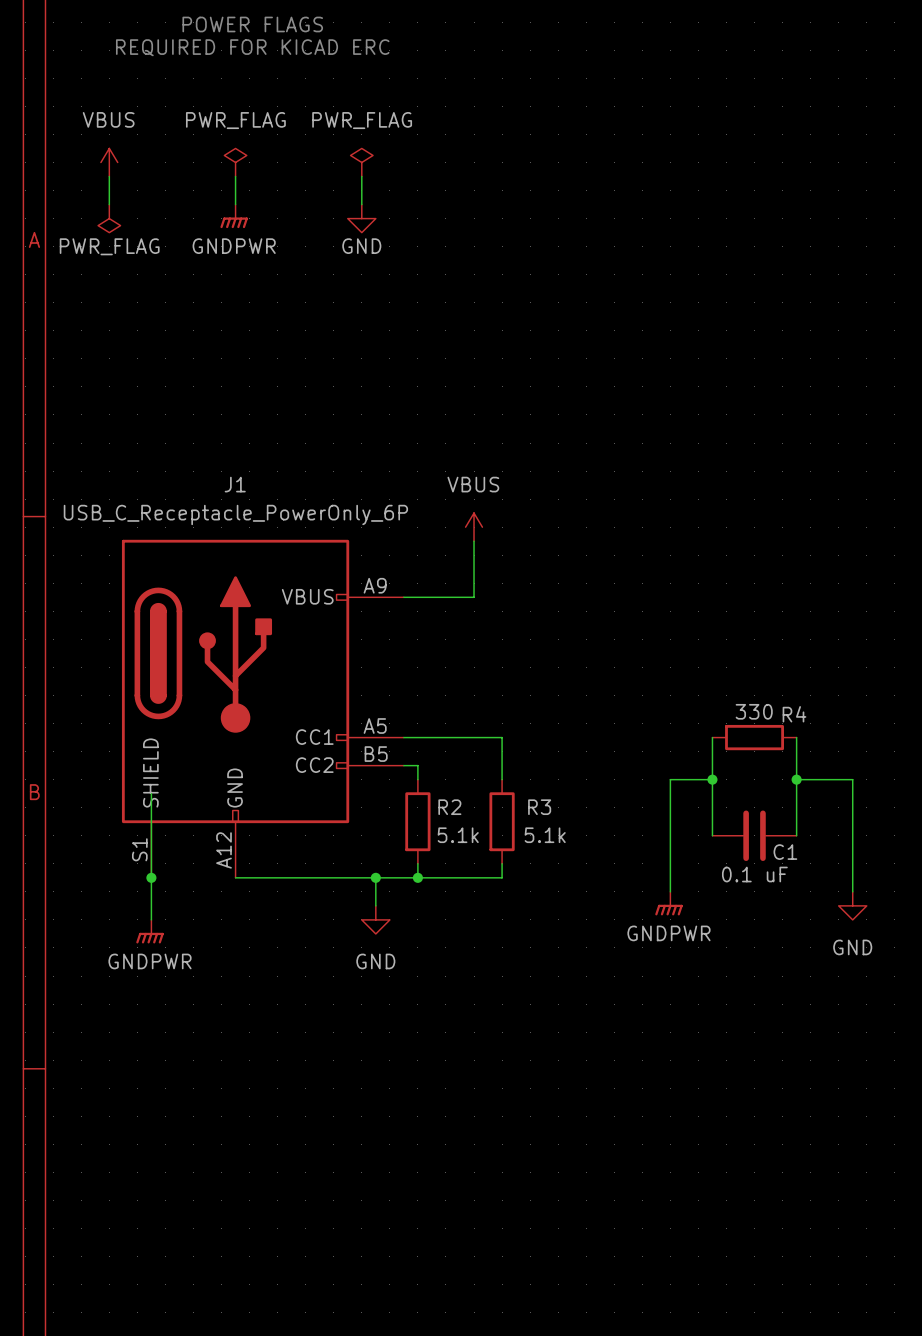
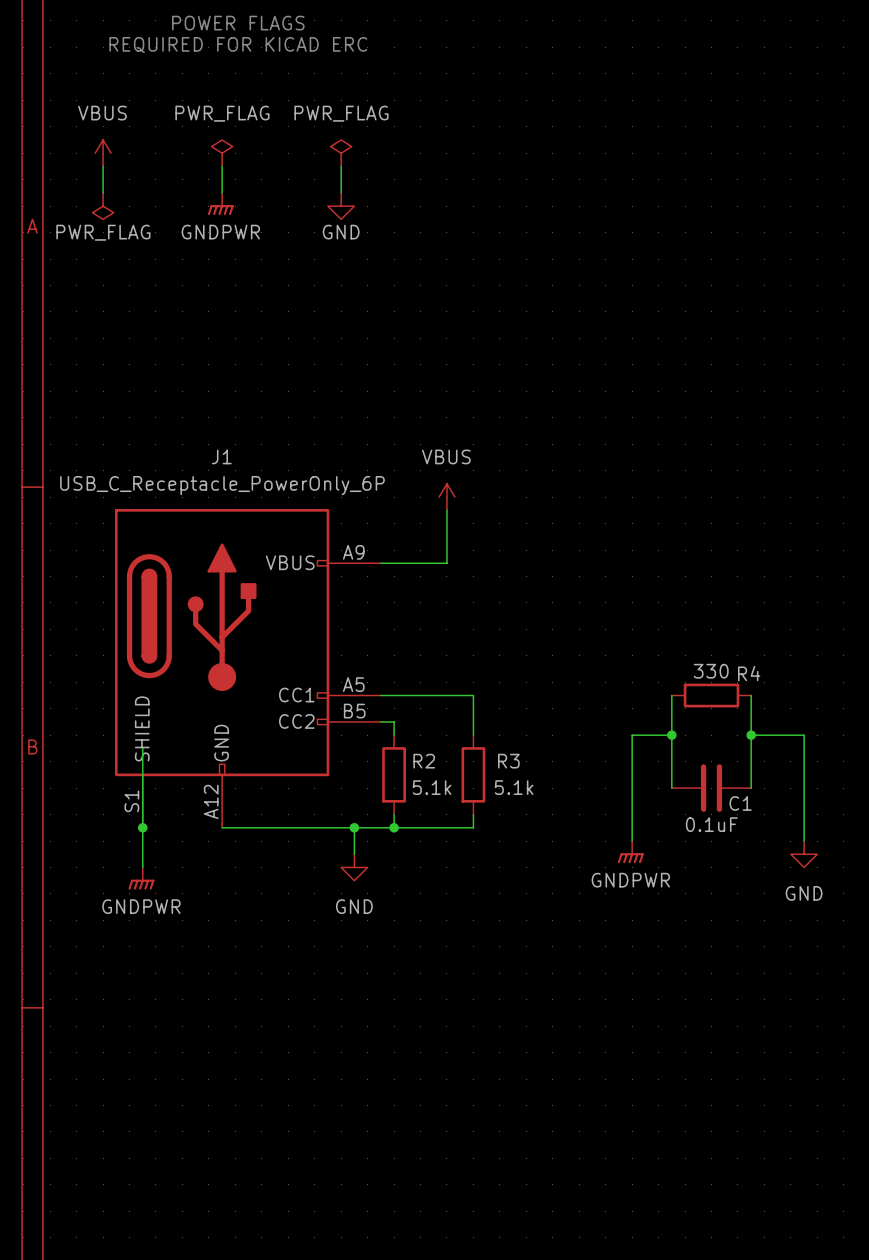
C1 value: 0.1 uF (754, 874) -> 0.1uF (711, 824)

